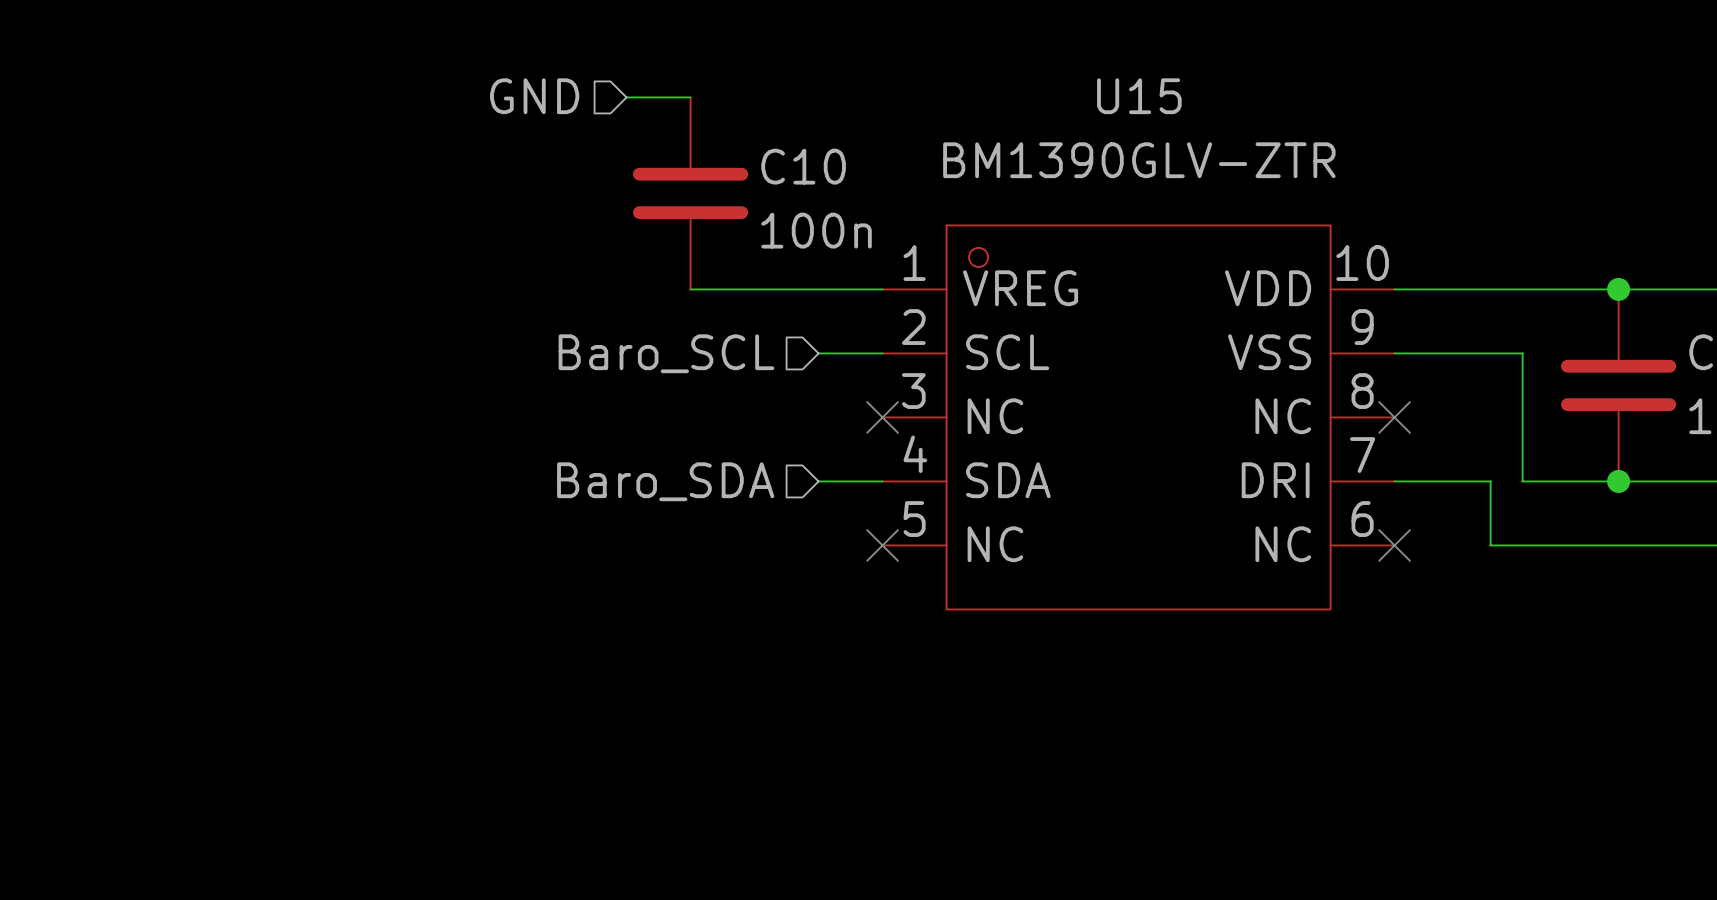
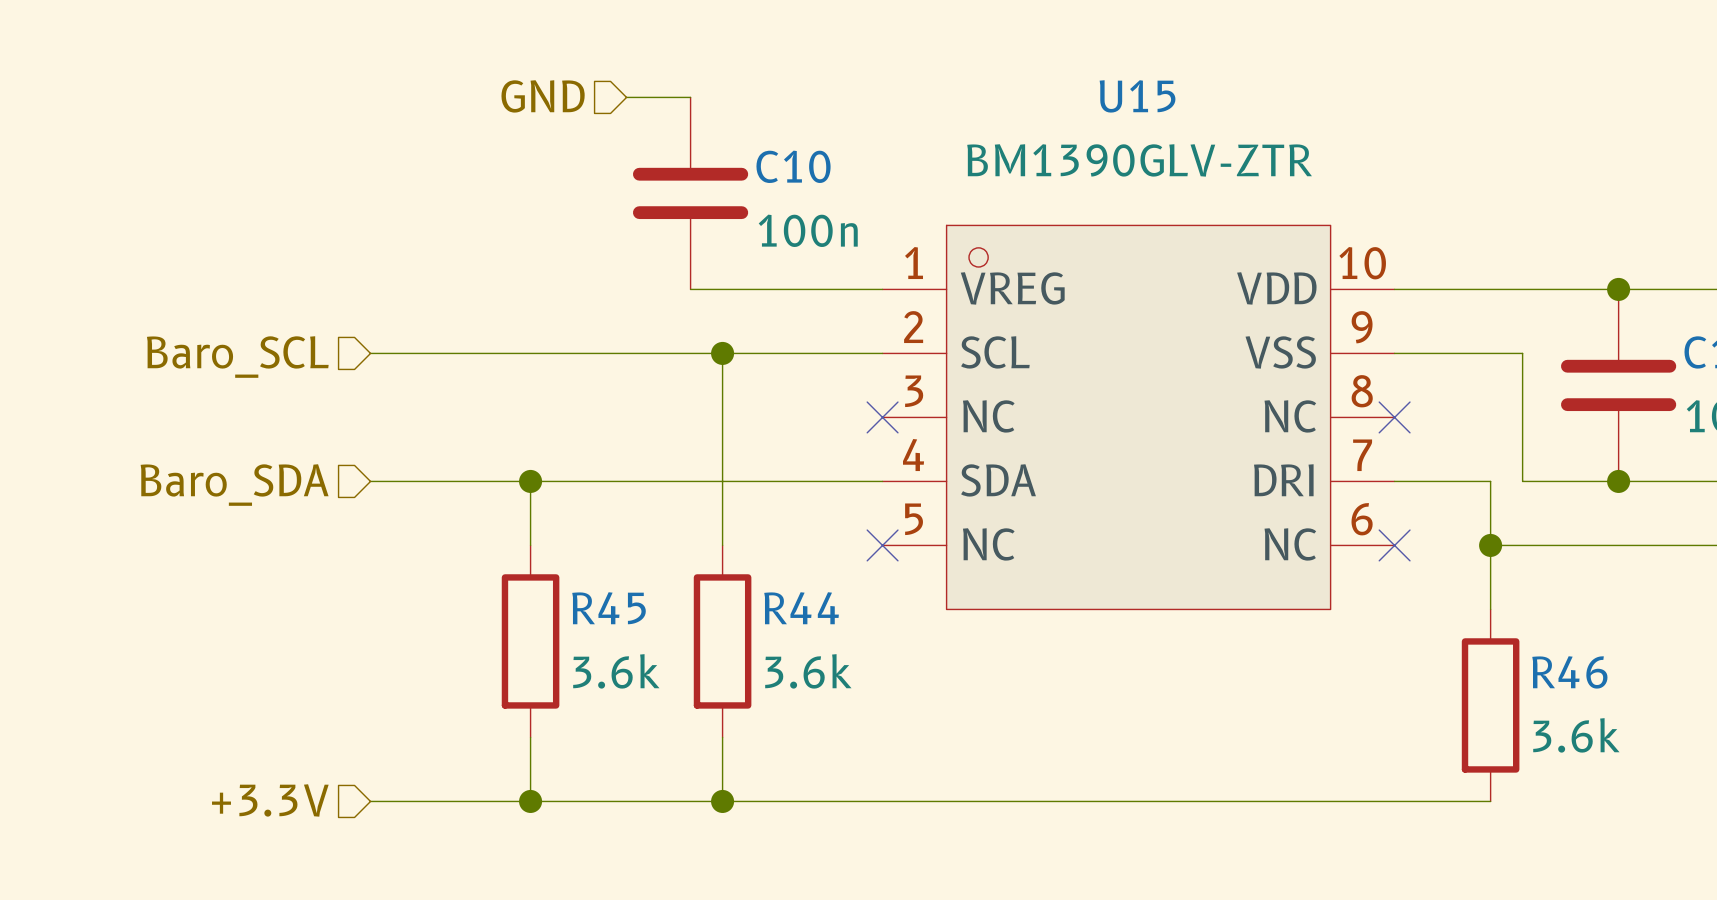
wire: none -> (370, 353) (818, 353)
hierarchical label position: Baro_SCL (666, 353) -> Baro_SCL (237, 357)
wire: none -> (722, 353) (722, 545)
junction: none -> (722, 353)
wire: none -> (370, 481) (818, 481)
wire: none -> (530, 481) (530, 545)
junction: none -> (530, 481)
hierarchical label position: Baro_SDA (665, 481) -> Baro_SDA (234, 485)
wire: none -> (1490, 545) (1490, 609)
junction: none -> (1490, 545)
R45: none -> 3.6k (530, 641)
R44: none -> 3.6k (722, 641)
R46: none -> 3.6k (1490, 705)
wire: none -> (530, 737) (530, 801)
wire: none -> (722, 737) (722, 801)
hierarchical label: none -> +3.3V (270, 800)
wire: none -> (370, 801) (1490, 801)
junction: none -> (530, 801)
junction: none -> (722, 801)

